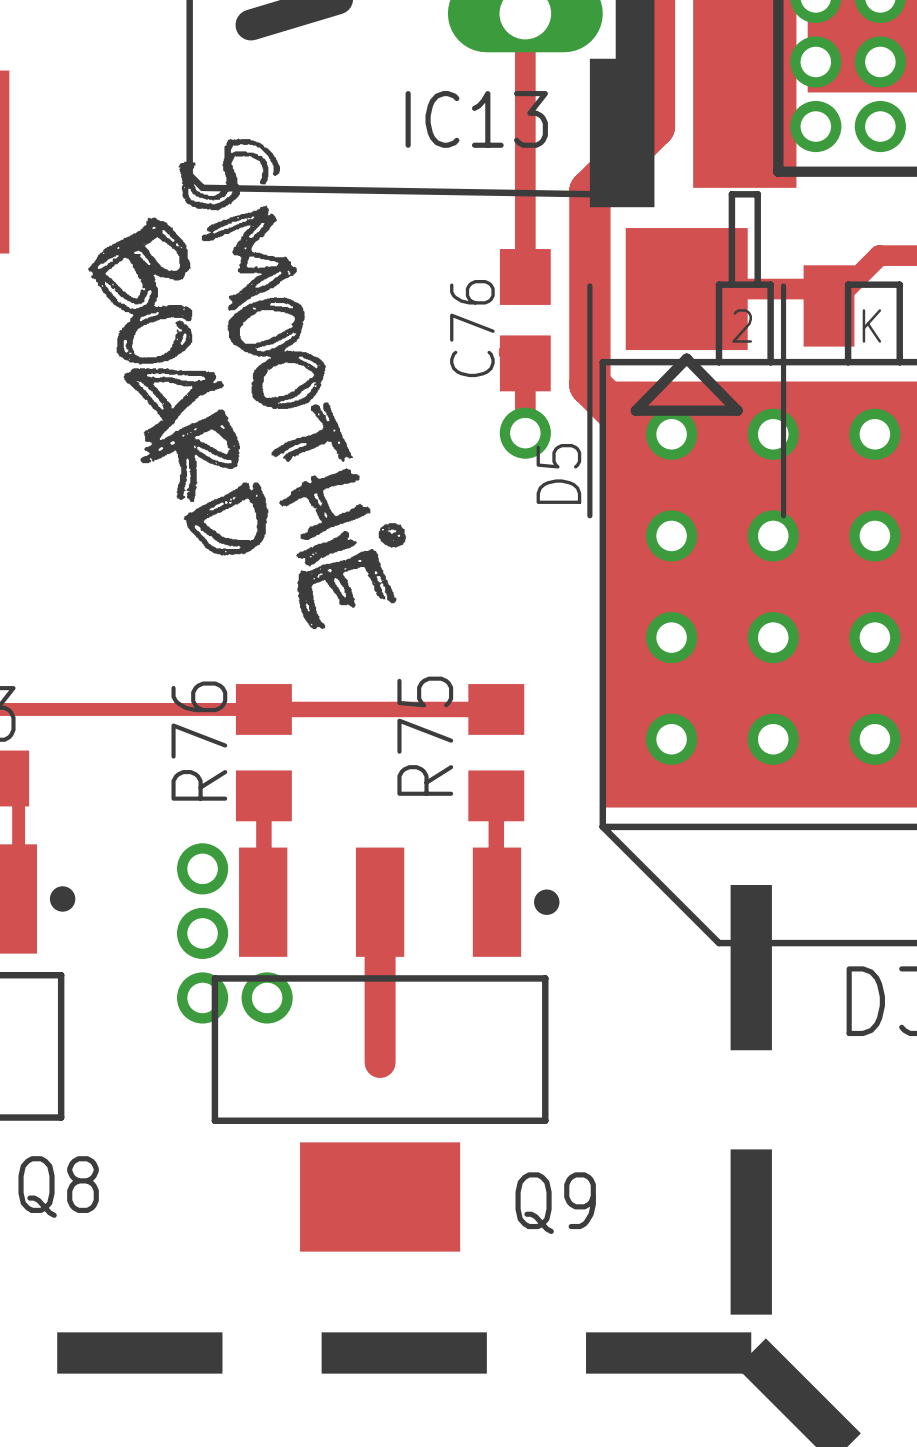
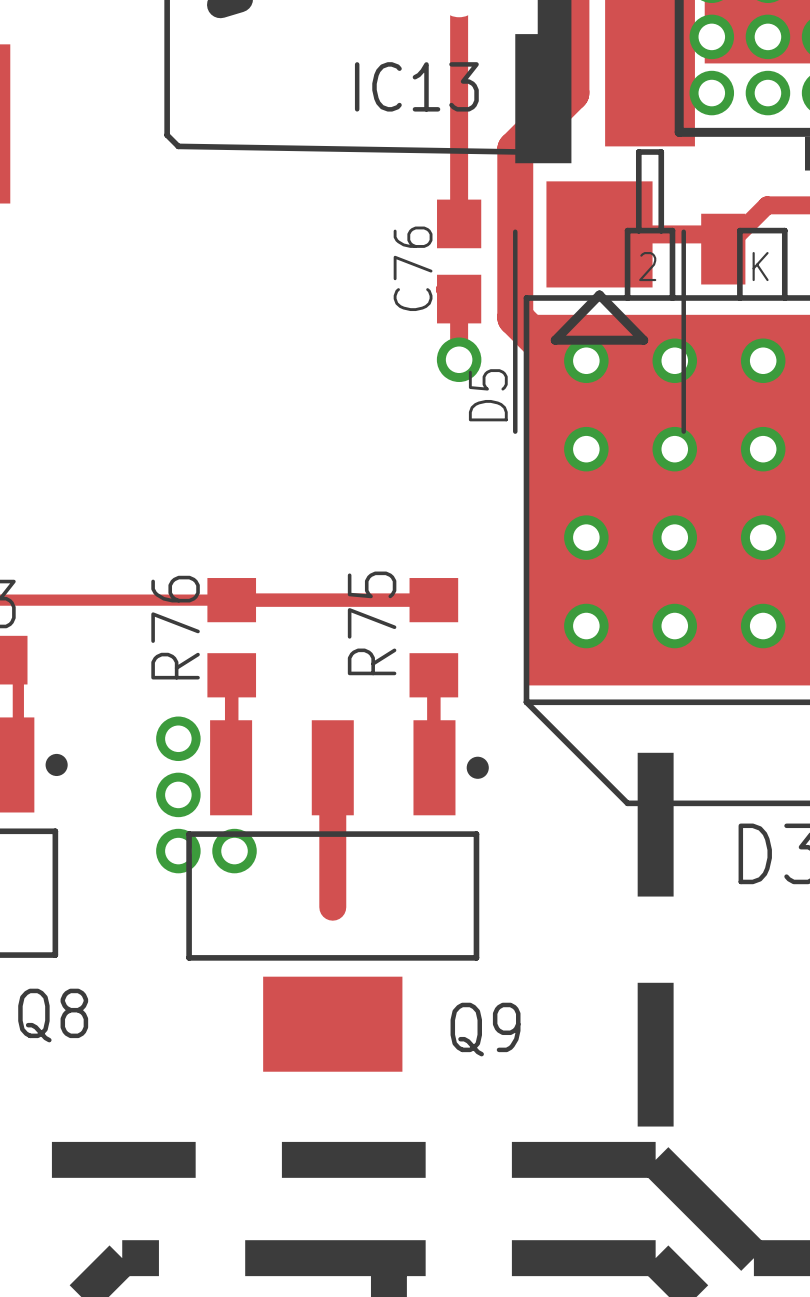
drawing: [88, 138, 406, 630] -> none

